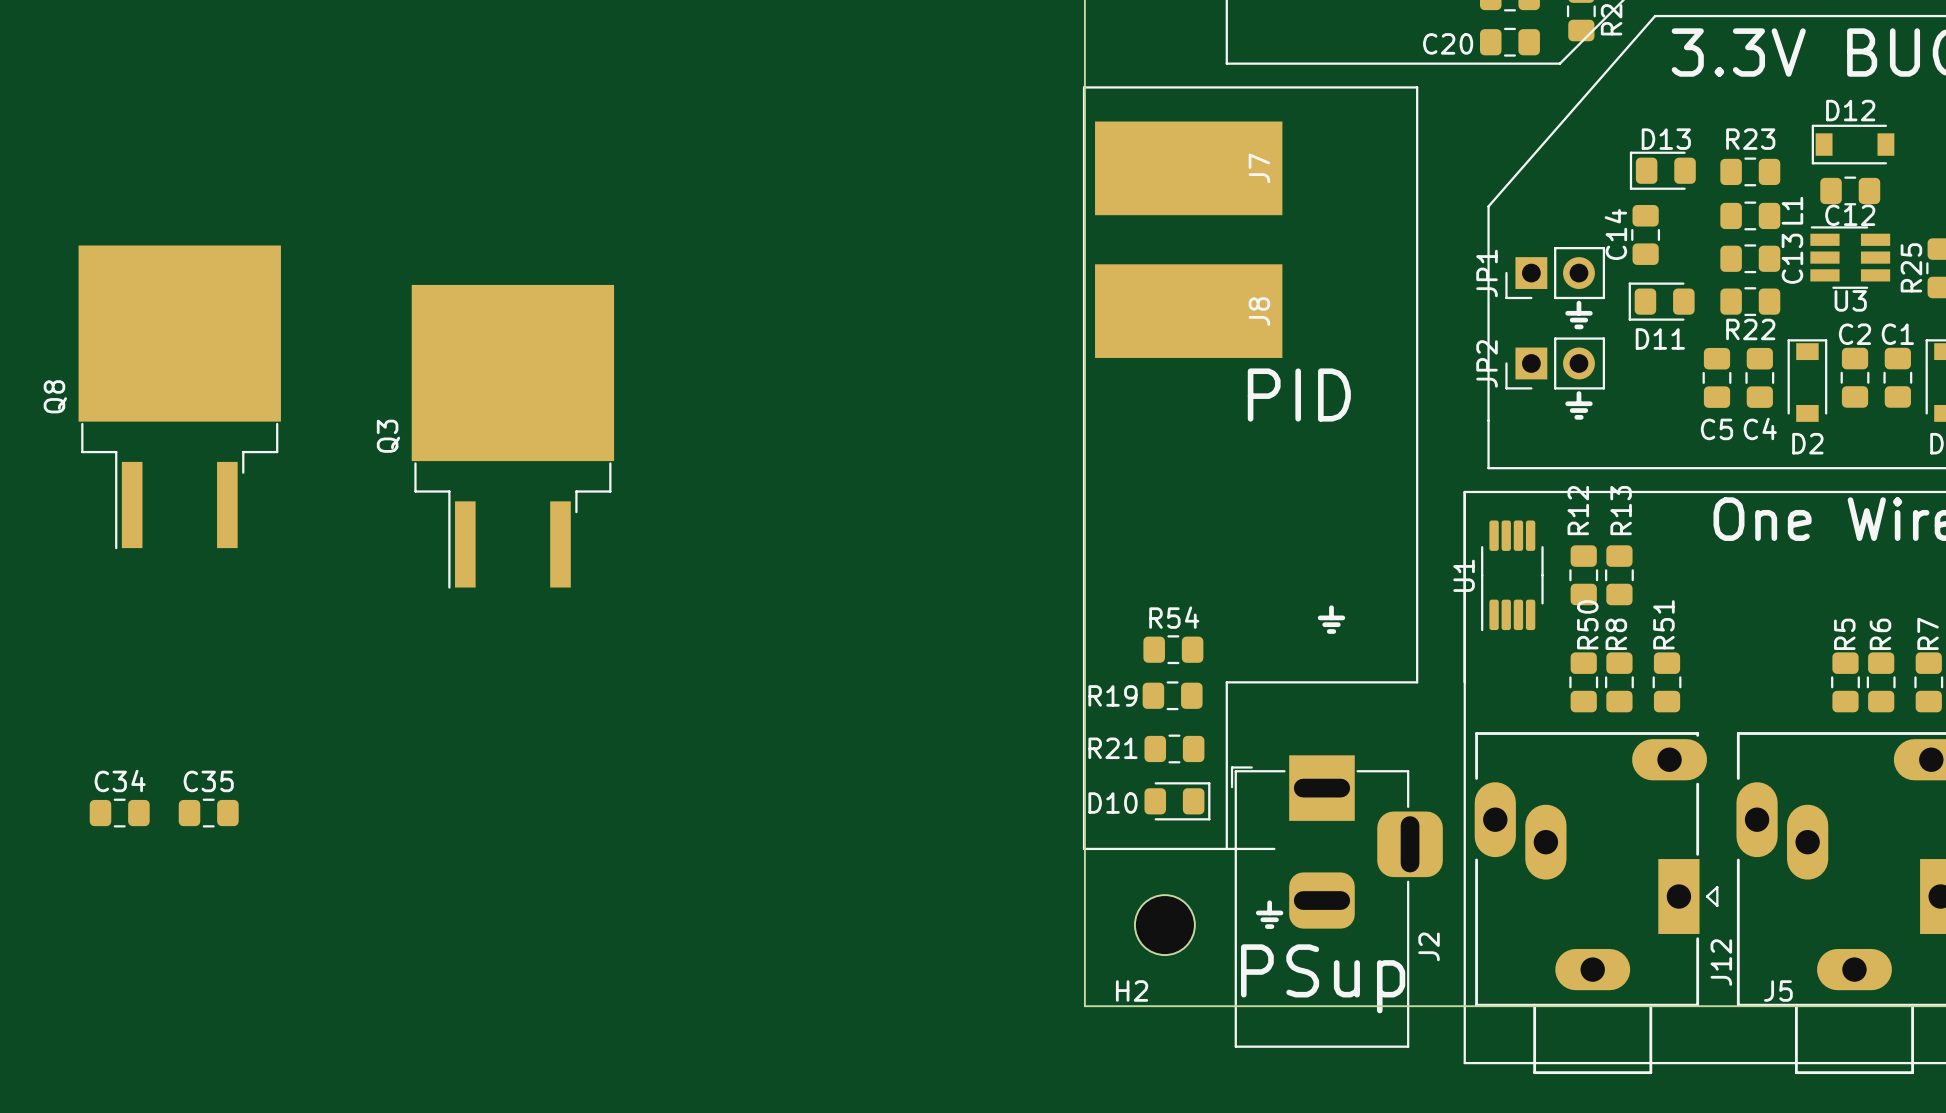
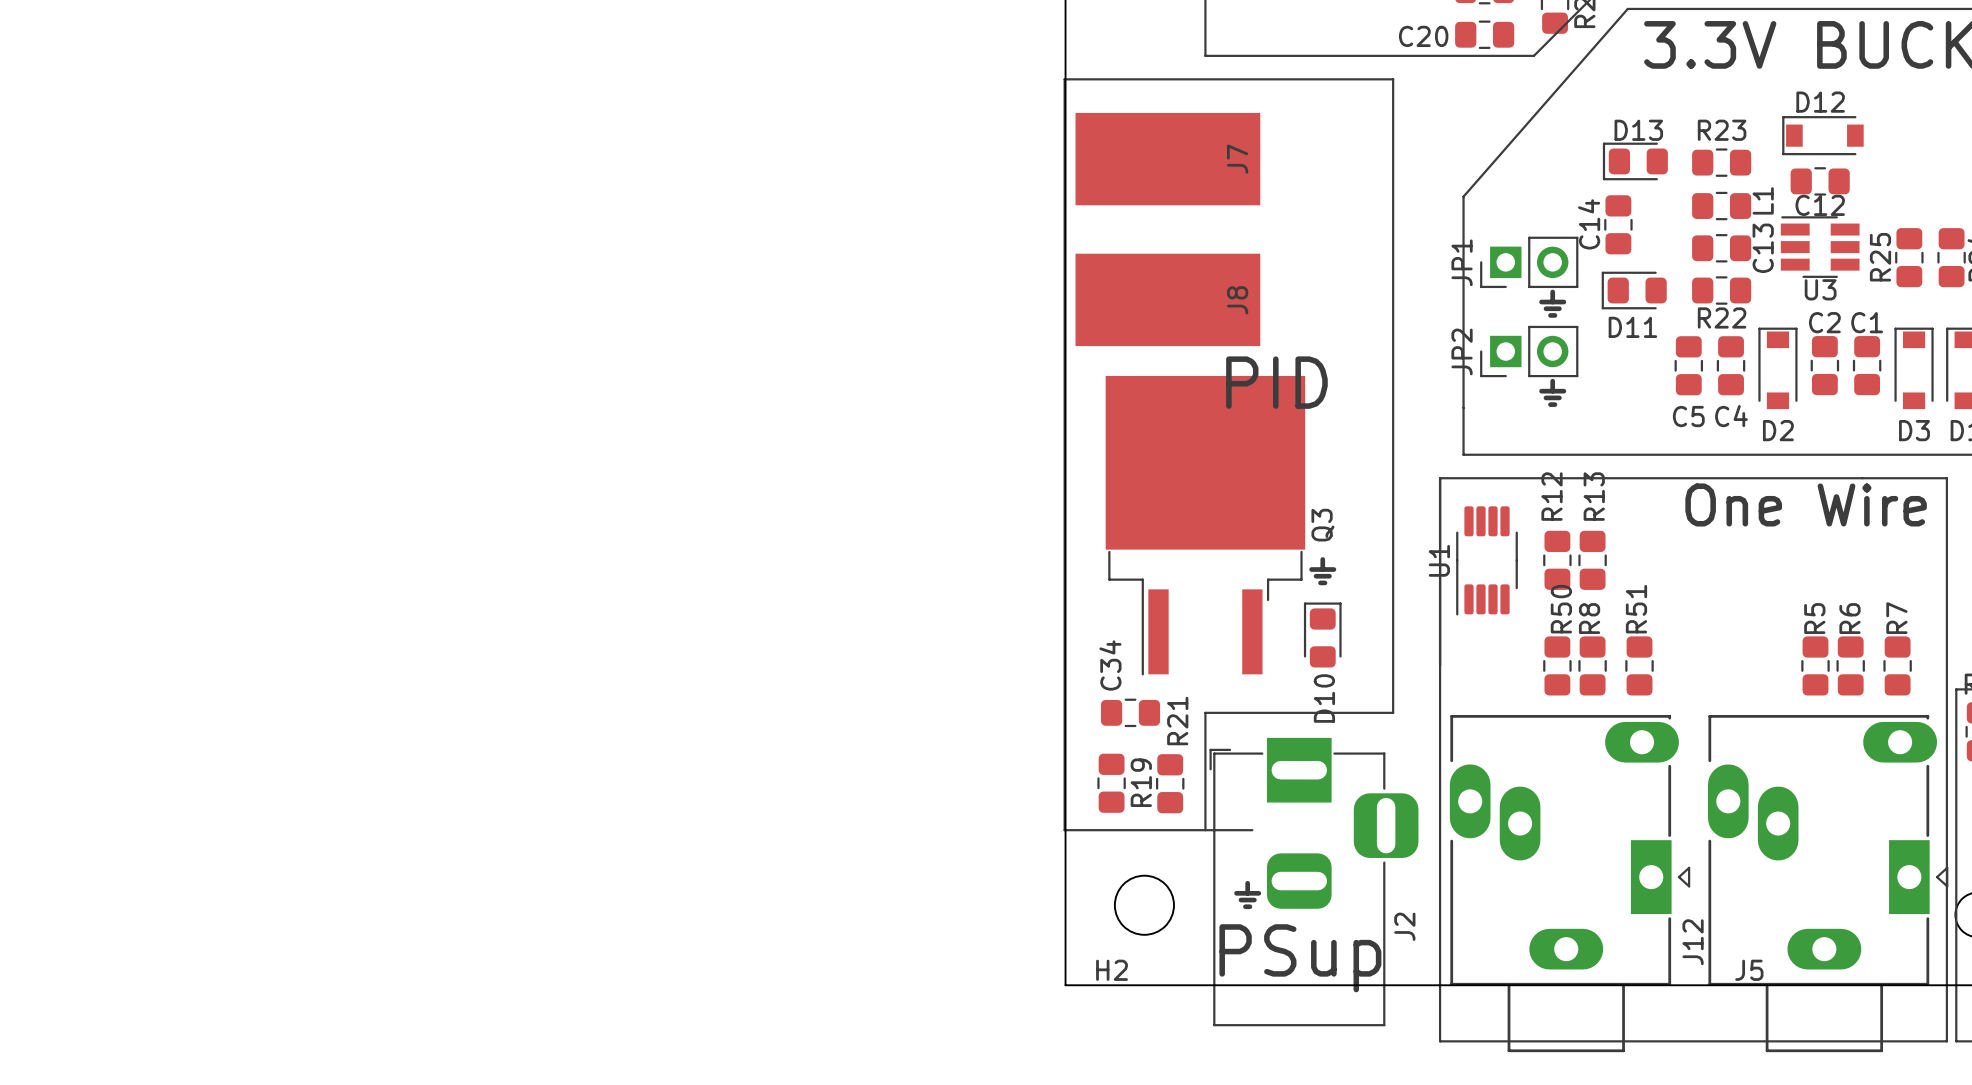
Q8: (179, 397) -> none
Q3 name position: Q3 (388, 436) -> Q3 (1322, 525)
Q3 position: (512, 436) -> (1205, 525)
text position: ⏚ (1331, 619) -> ⏚ (1322, 571)
R54: (1173, 649) -> none
line: (1417, 682) (1226, 682) (1226, 729) -> (1393, 665) (1393, 712) (1205, 712)
R19 name position: R19 (1113, 695) -> R19 (1141, 782)
R19 rotation: 0° (1172, 695) -> 90° clockwise (1111, 783)
R19 position: (1172, 695) -> (1111, 783)
R21 rotation: 0° (1174, 748) -> 90° clockwise (1170, 783)
R21 position: (1174, 748) -> (1170, 783)
C34 name rotation: 0° (120, 780) -> 90° counterclockwise (1110, 665)
D10 rotation: 0° (1177, 801) -> 90° counterclockwise (1322, 634)
D10 position: (1177, 801) -> (1322, 634)
C34 position: (119, 813) -> (1130, 712)
C35: (208, 813) -> none

